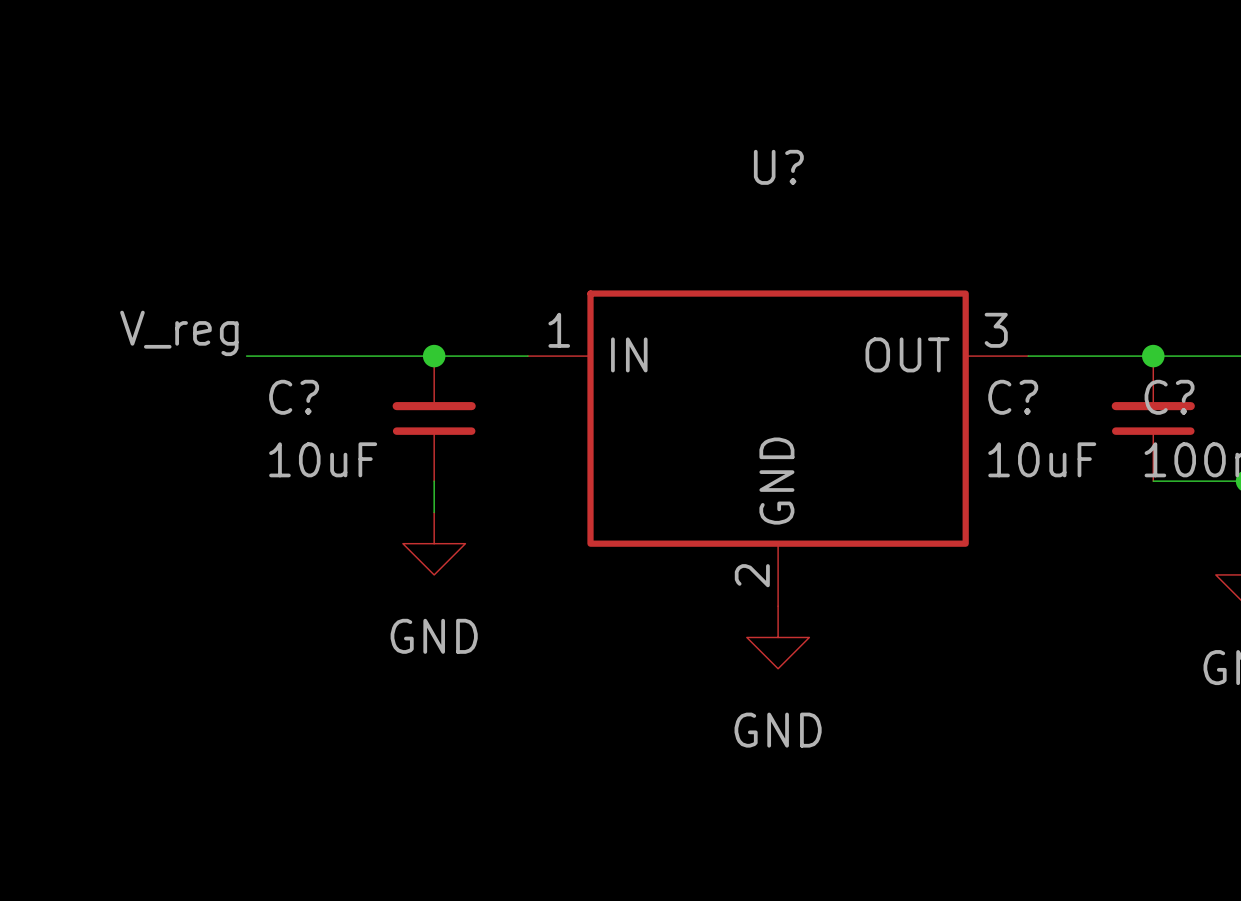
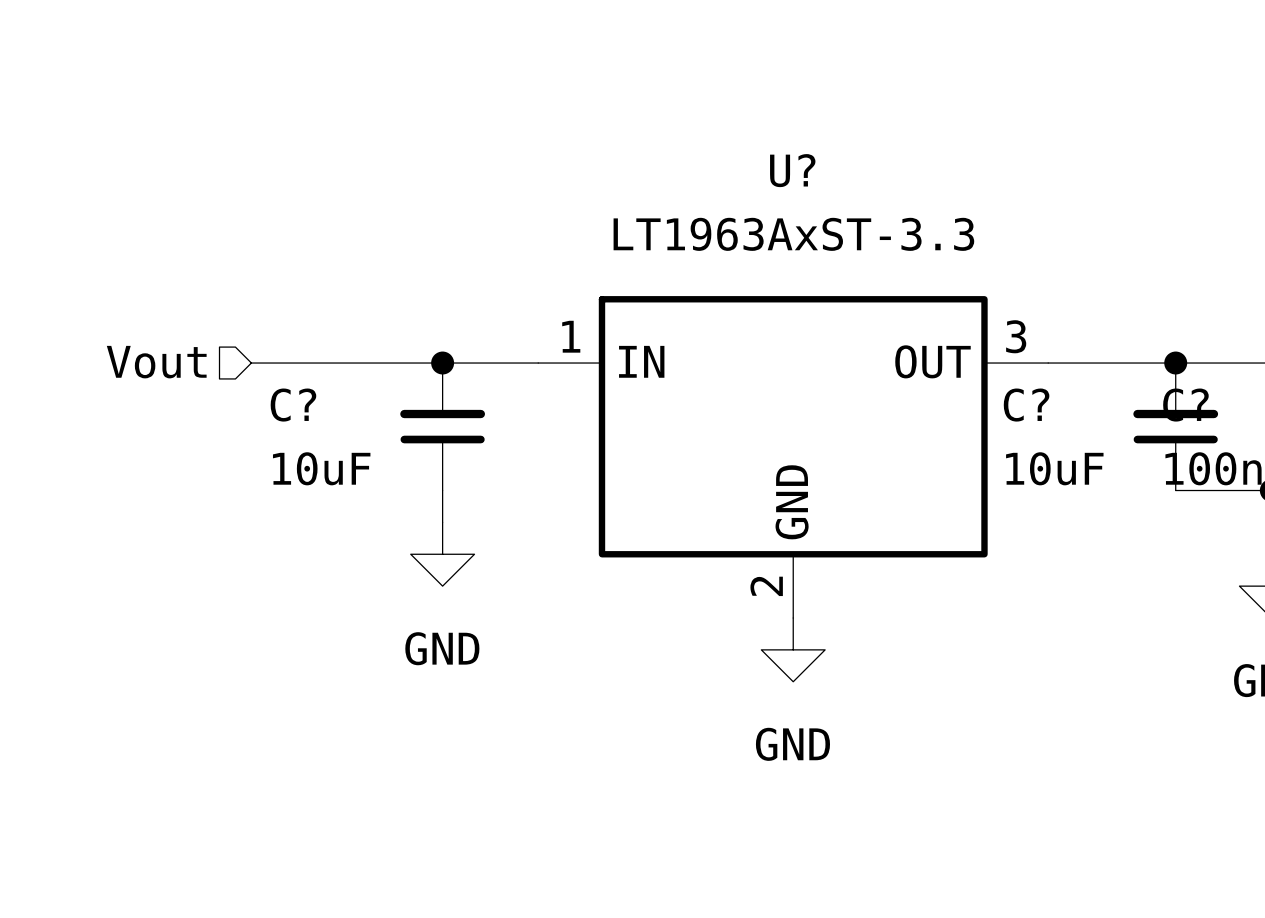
U? value: none -> LT1963AxST-3.3 (793, 234)
label: V_reg (179, 333) -> none
hierarchical label: none -> Vout (156, 362)

